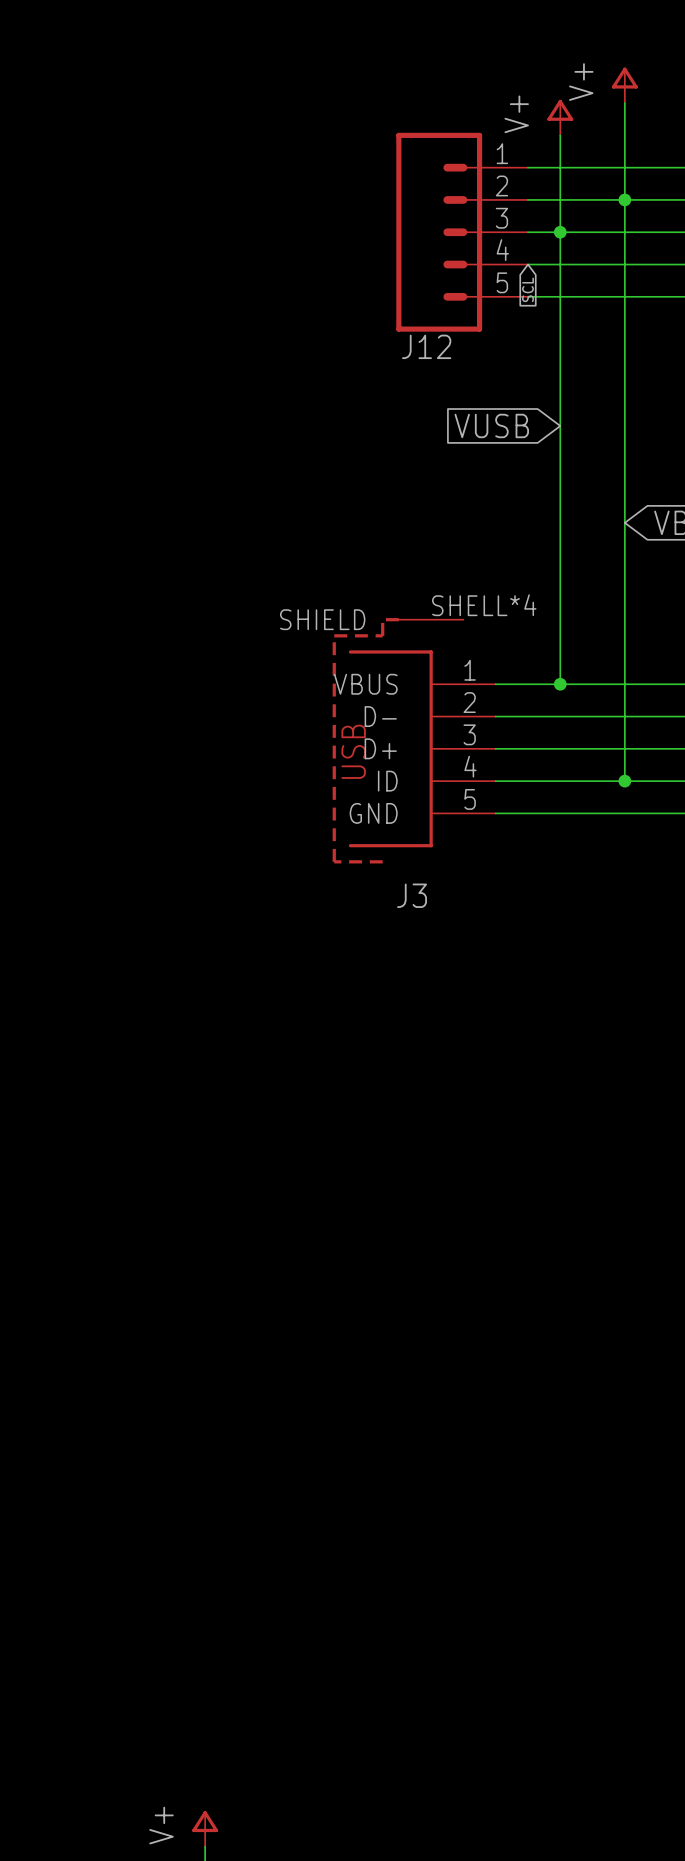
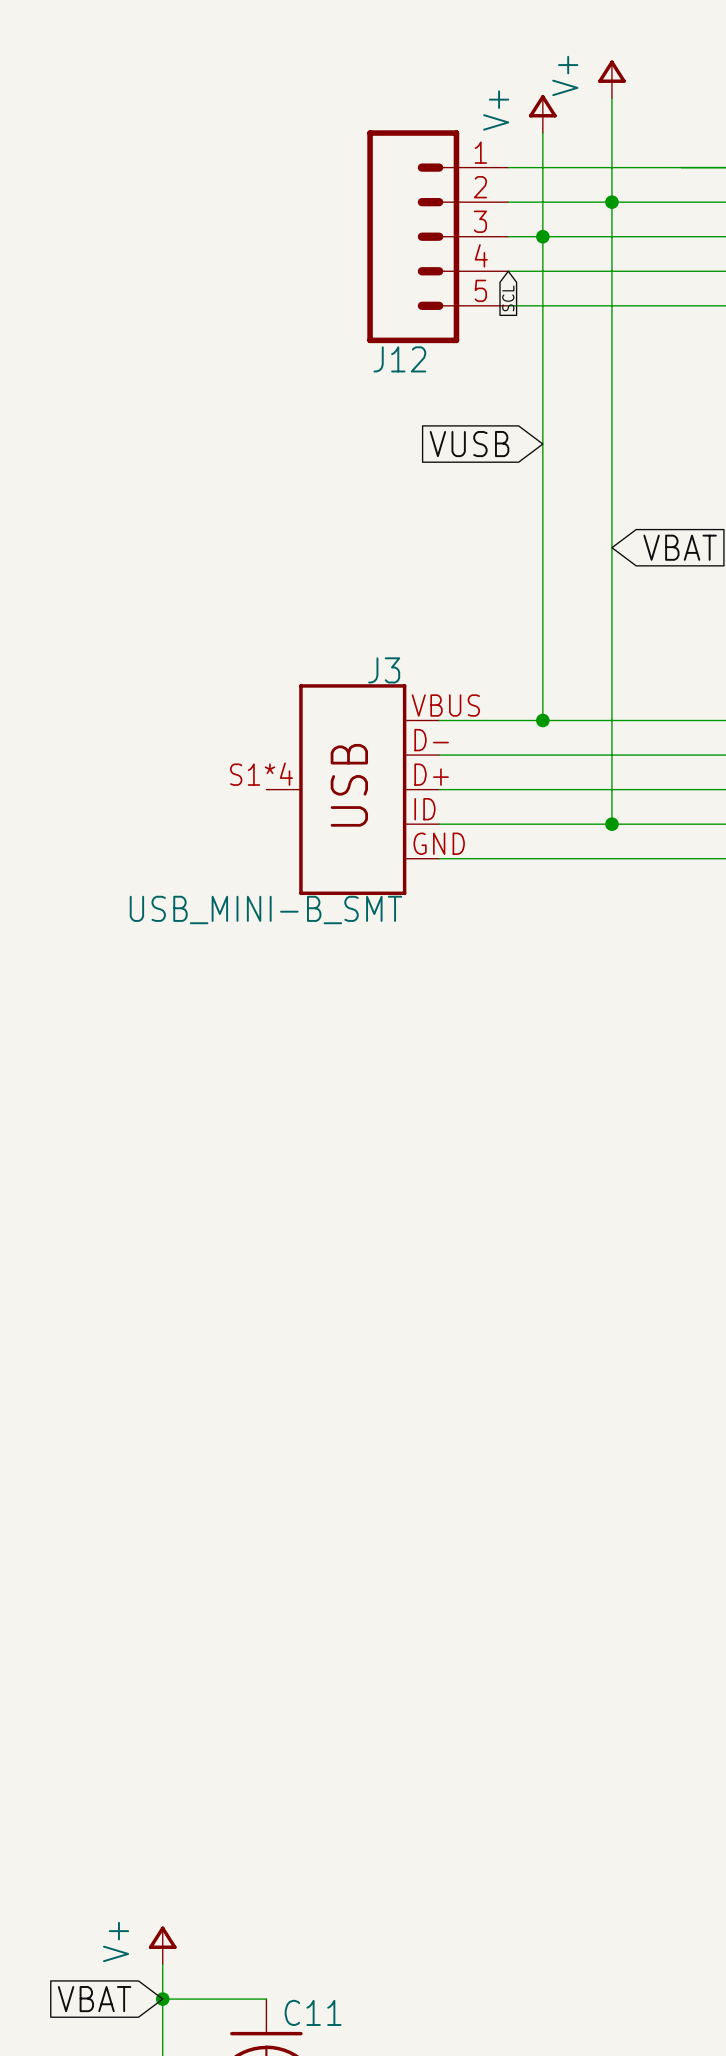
J3 symbol: [332, 618, 496, 864] -> [266, 684, 440, 896]
J3 value: none -> USB_MINI-B_SMT (265, 909)
J3 name position: J3 (412, 895) -> J3 (384, 670)

